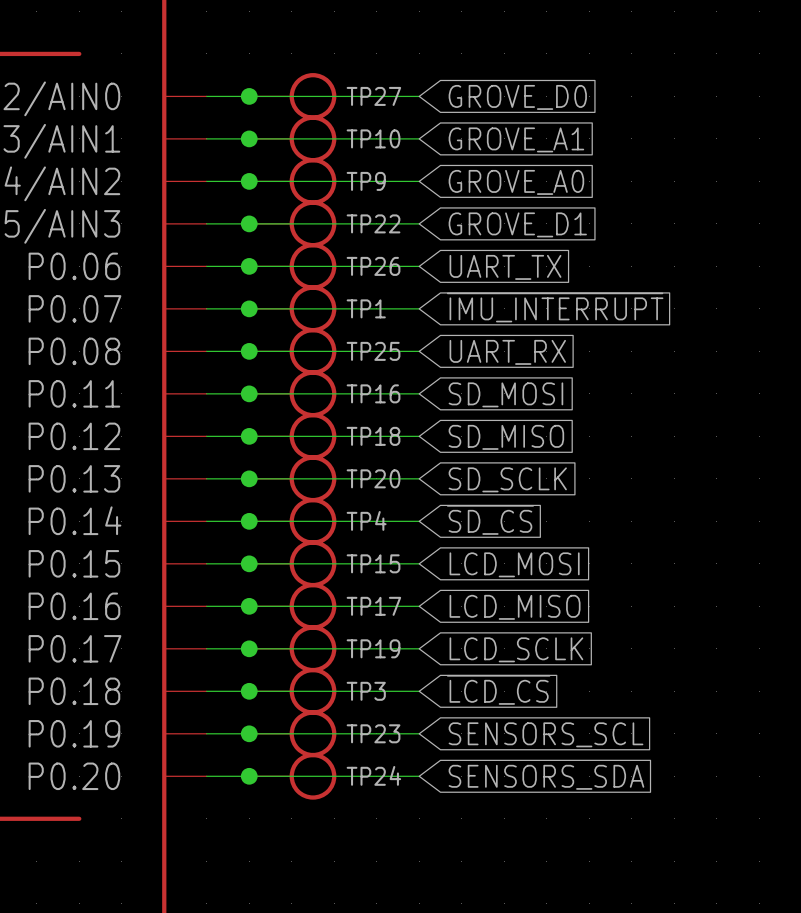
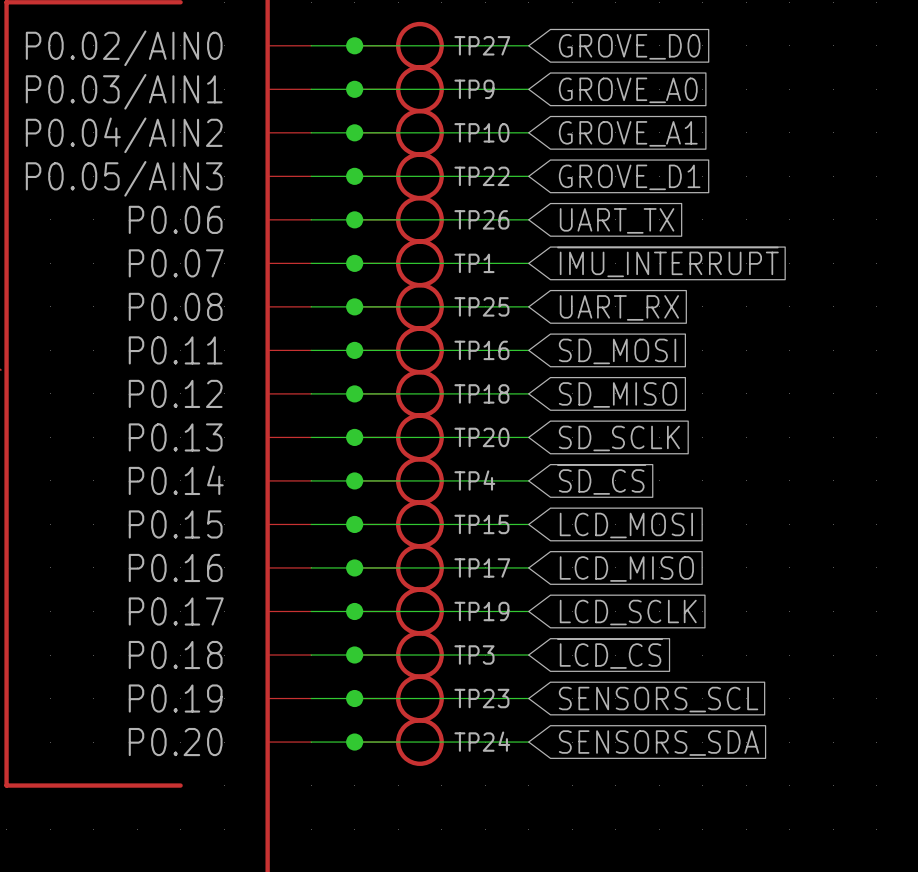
TP10 name: TP10 (373, 138) -> TP9 (474, 89)
global label: GROVE_A1 (516, 139) -> GROVE_A0 (628, 90)
TP9 name: TP9 (366, 181) -> TP10 (481, 132)
global label: GROVE_A0 (516, 182) -> GROVE_A1 (628, 133)

